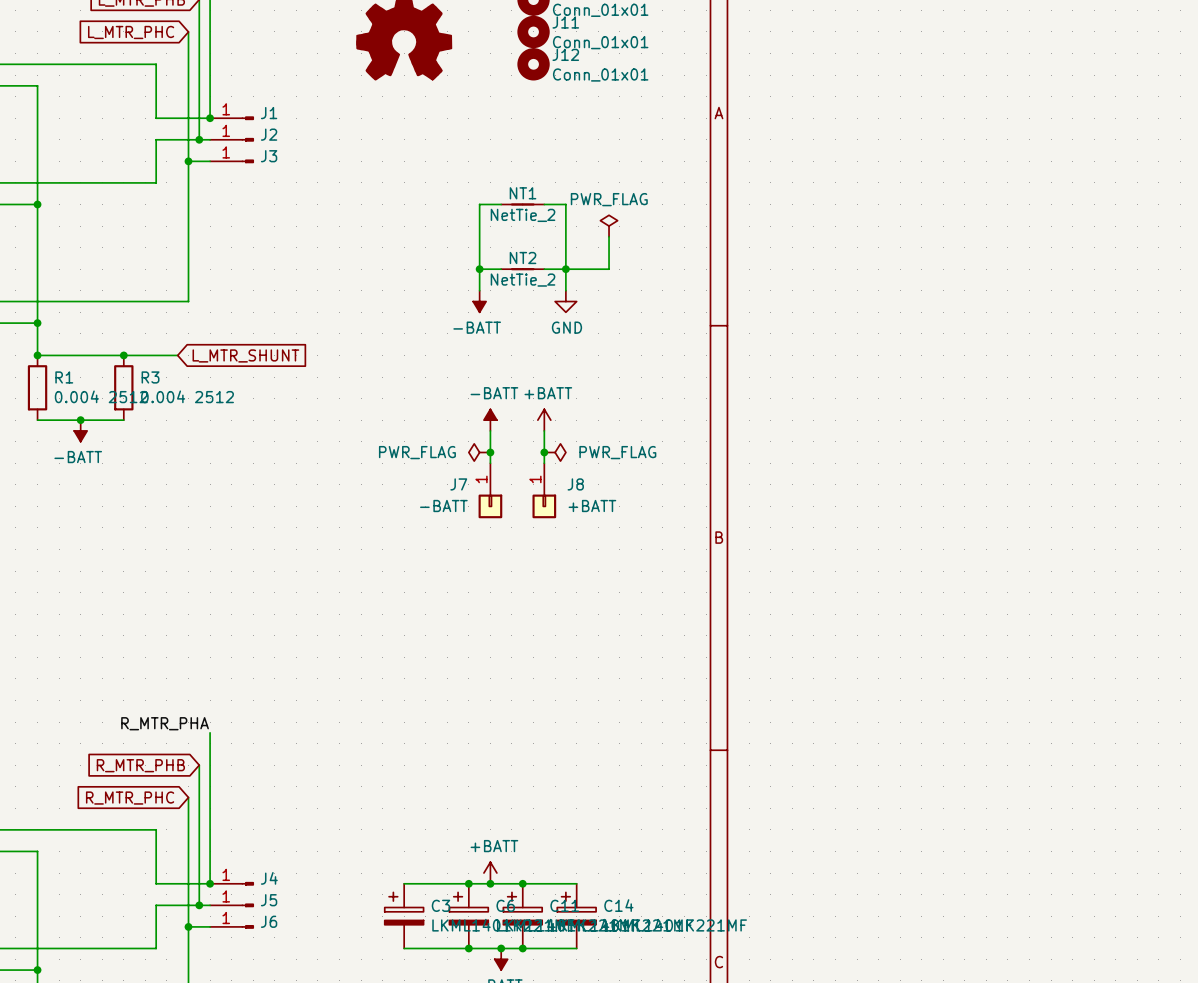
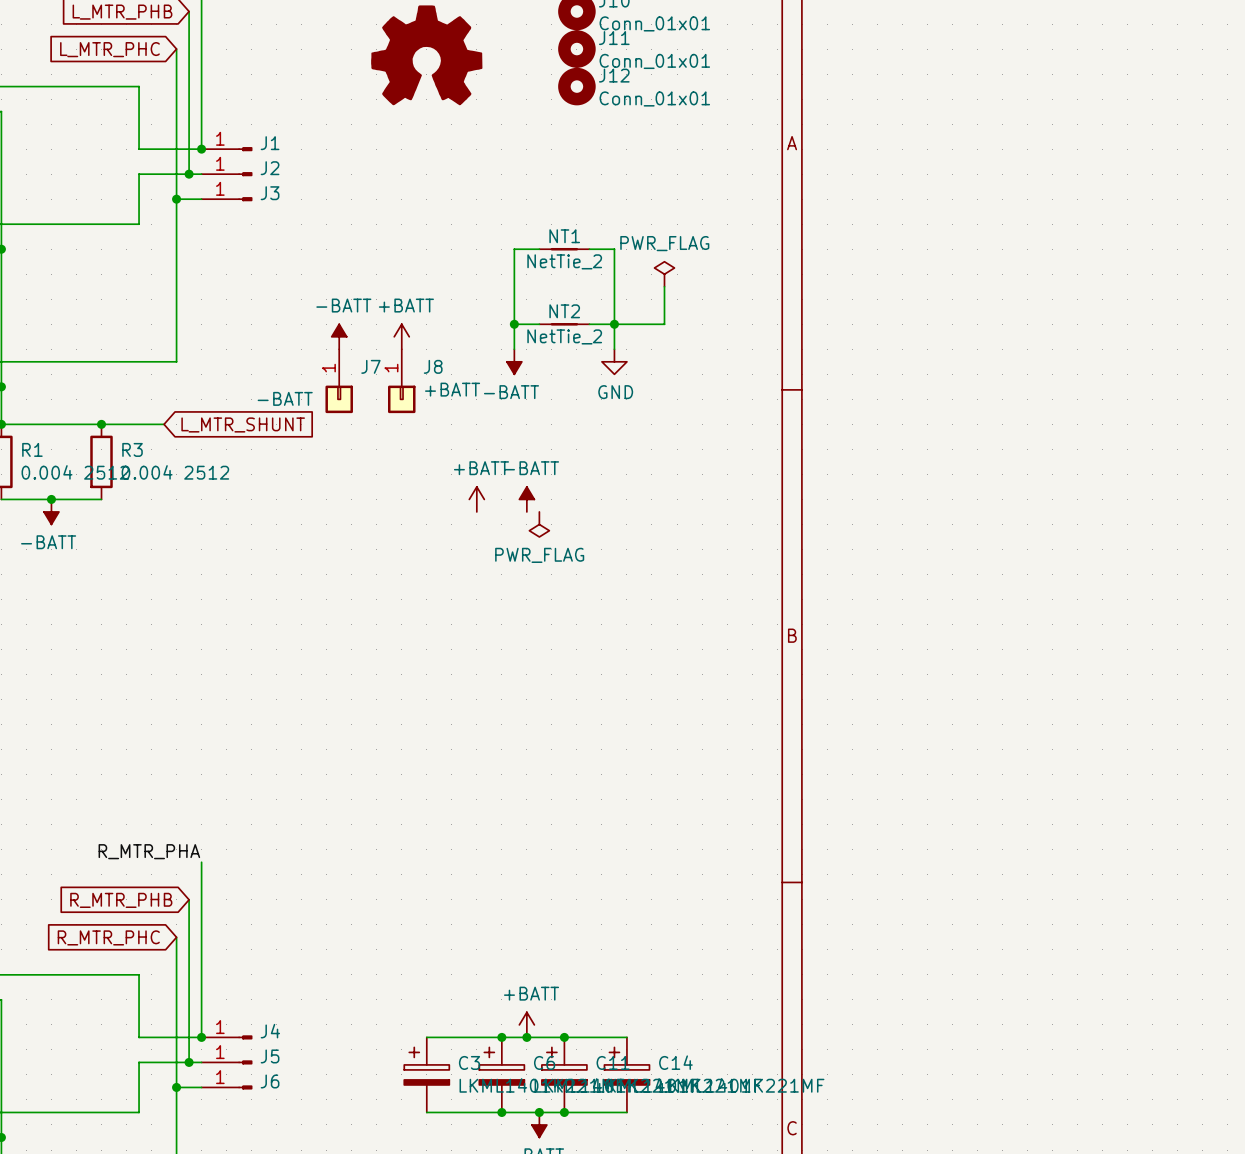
power symbol: none -> -BATT (339, 336)
power symbol: none -> +BATT (401, 336)
power symbol position: +BATT (544, 420) -> +BATT (476, 499)
wire: (490, 430) (490, 463) -> none
wire: (544, 430) (544, 463) -> none
power symbol text position: PWR_FLAG (417, 452) -> PWR_FLAG (539, 555)
power symbol rotation: 0° (479, 452) -> 90° counterclockwise (539, 524)
power symbol position: PWR_FLAG (479, 452) -> PWR_FLAG (539, 524)
junction: (490, 452) -> none
junction: (544, 452) -> none
power symbol: PWR_FLAG (555, 452) -> none
J7 name position: J7 (458, 484) -> J7 (370, 366)
J8 name position: J8 (575, 484) -> J8 (433, 366)
J7 position: (490, 490) -> (339, 381)
J8 position: (544, 490) -> (401, 381)
J8 value position: +BATT (592, 506) -> +BATT (452, 389)

